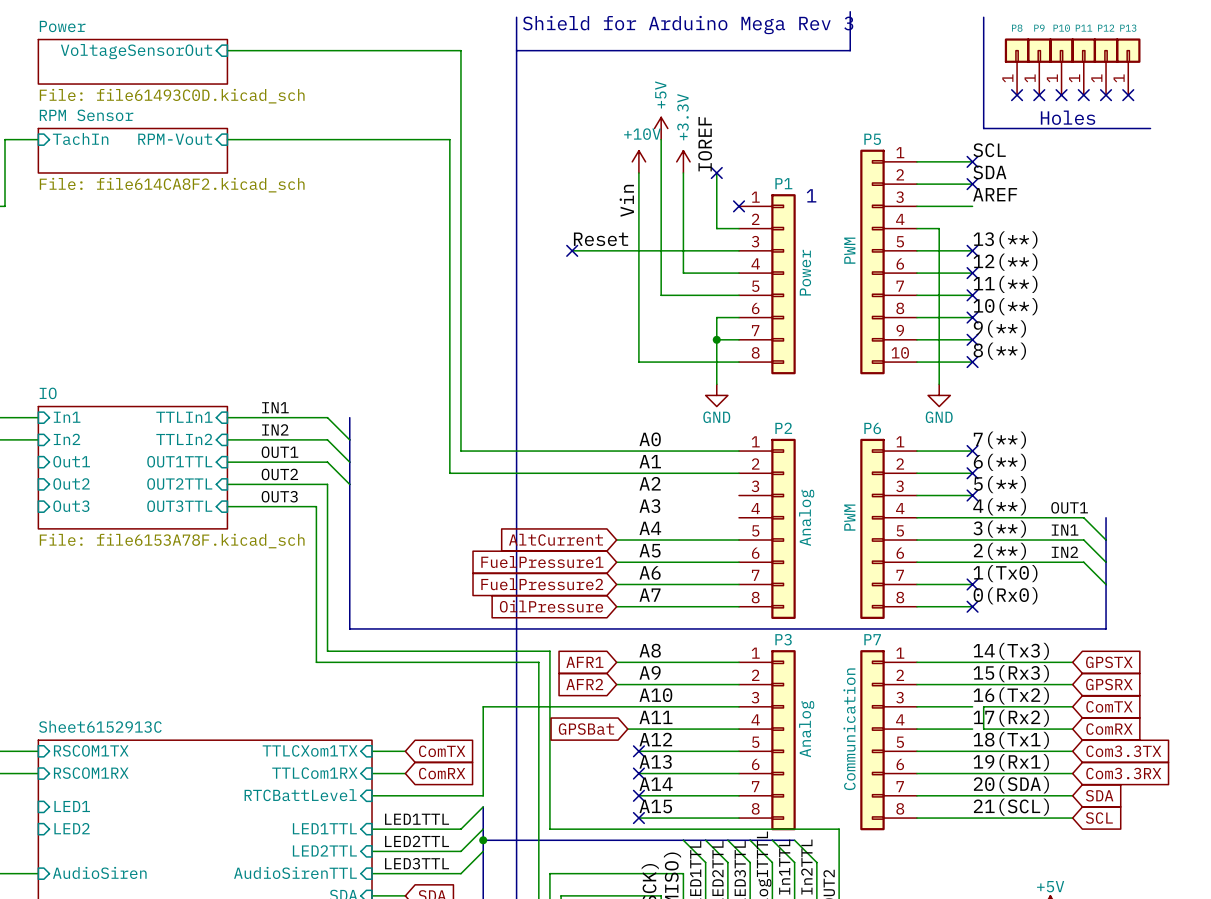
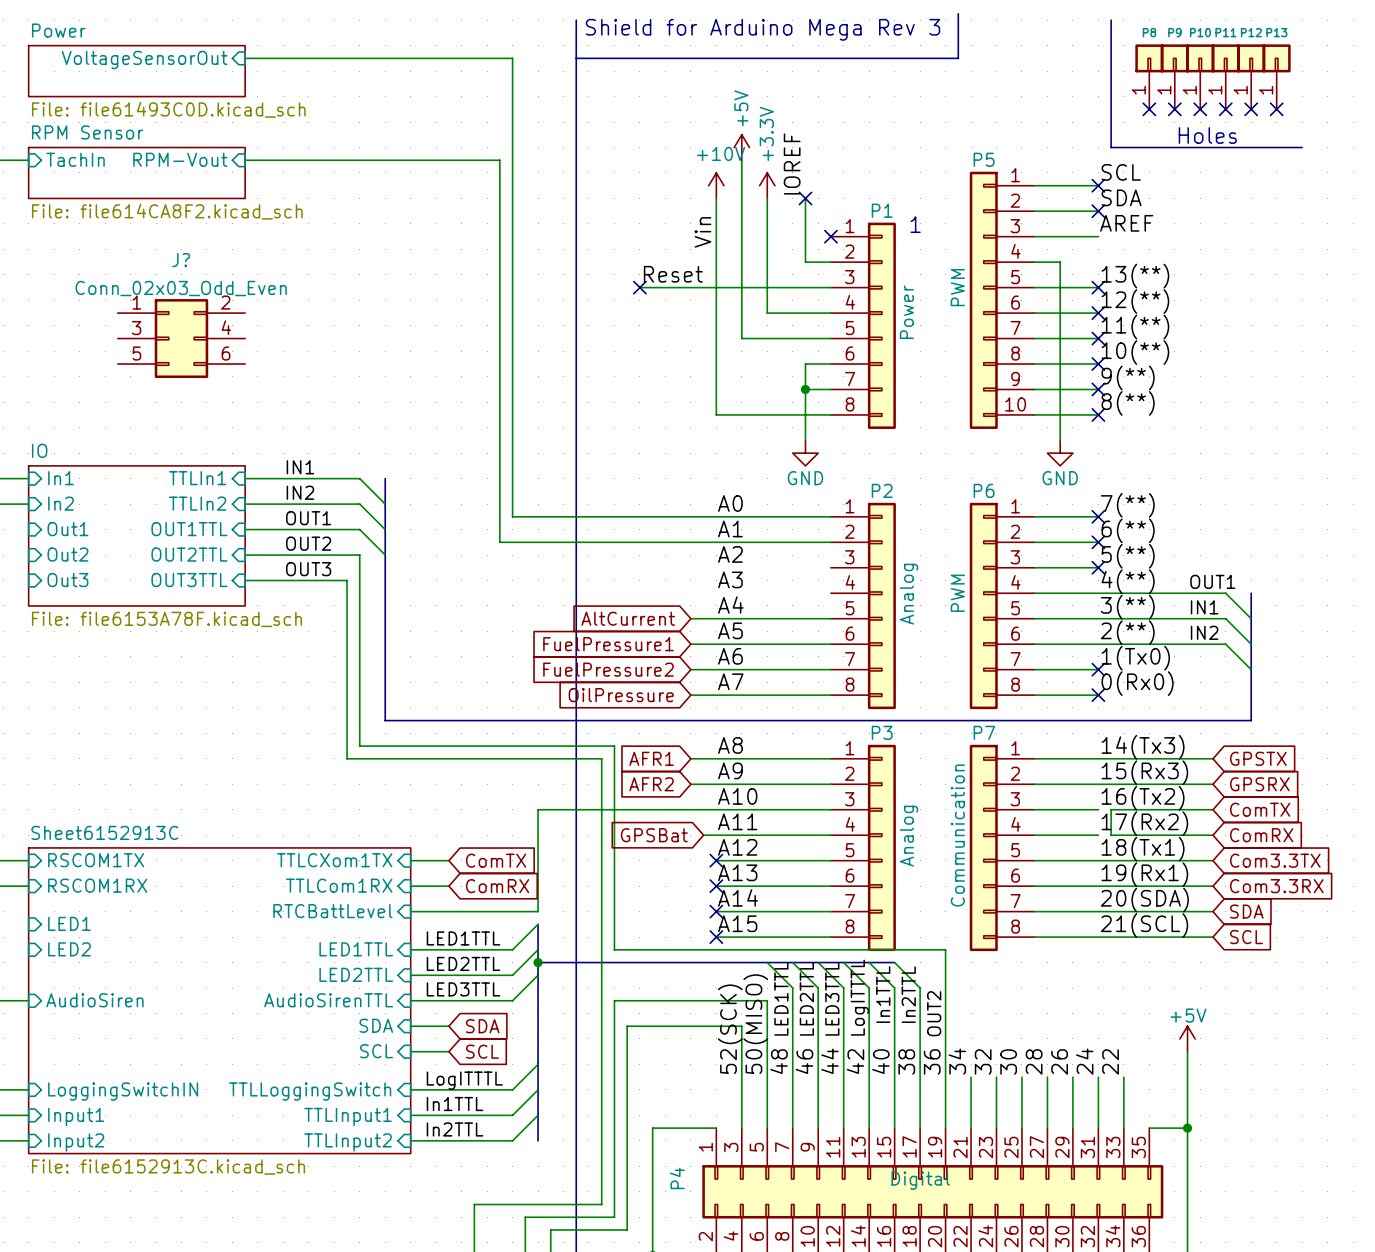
J?: none -> Conn_02x03_Odd_Even (181, 338)

